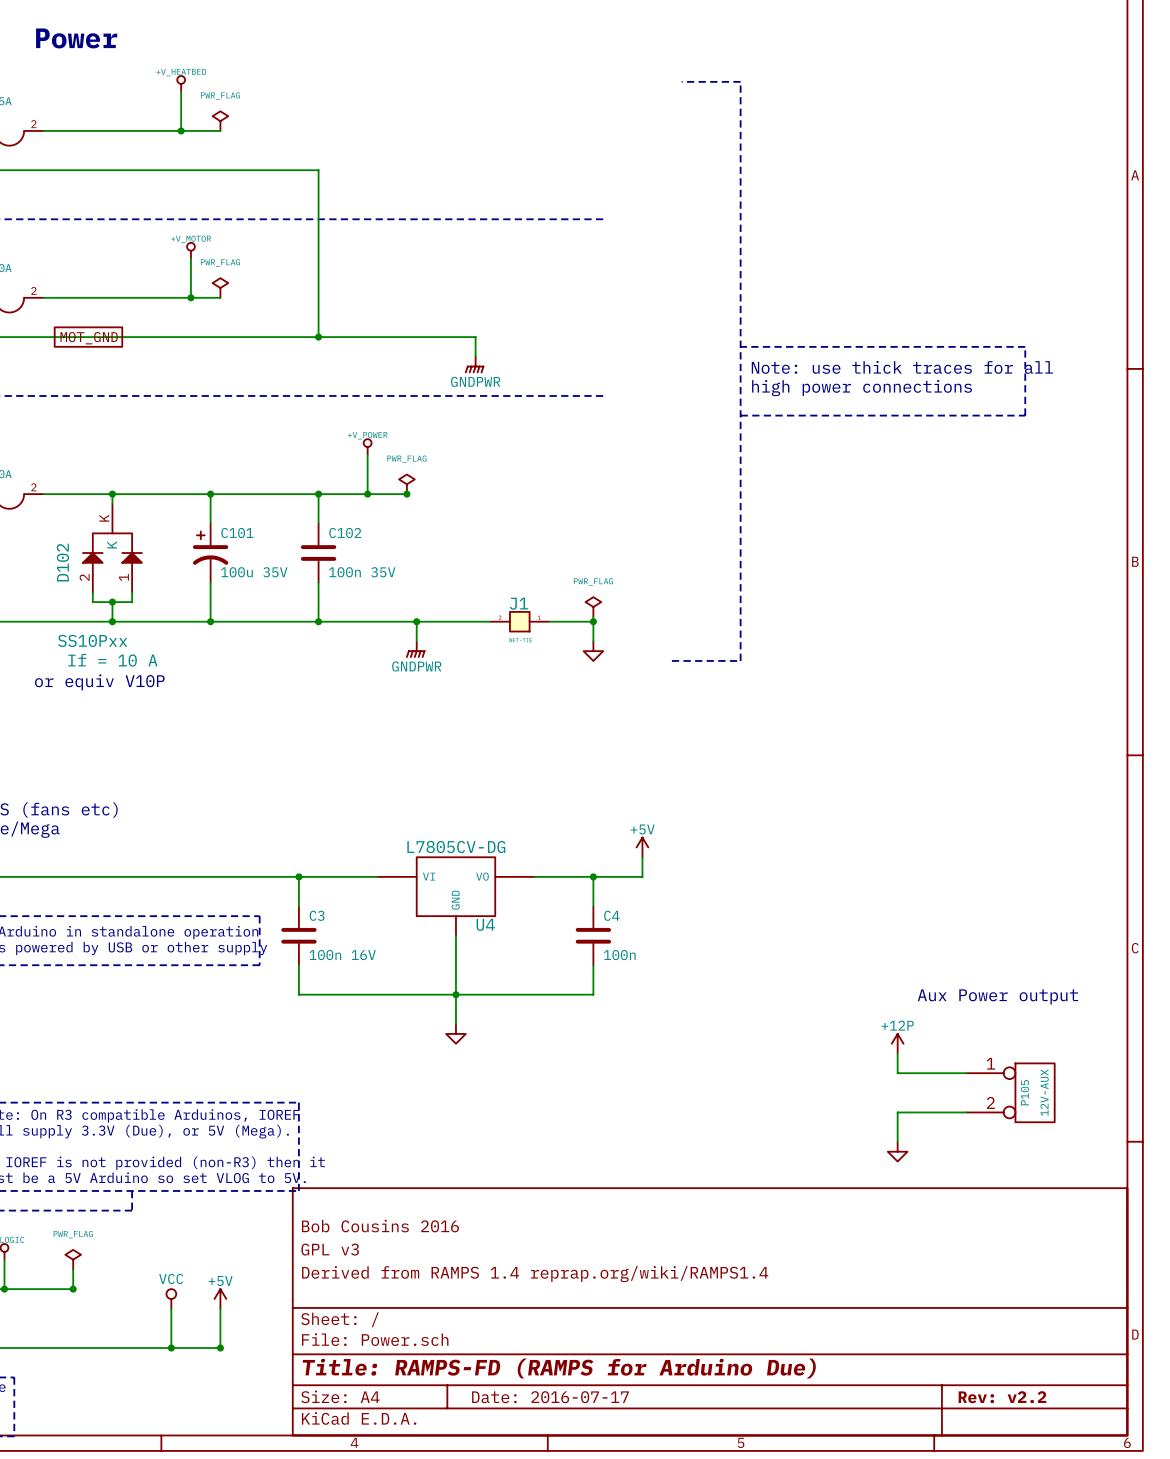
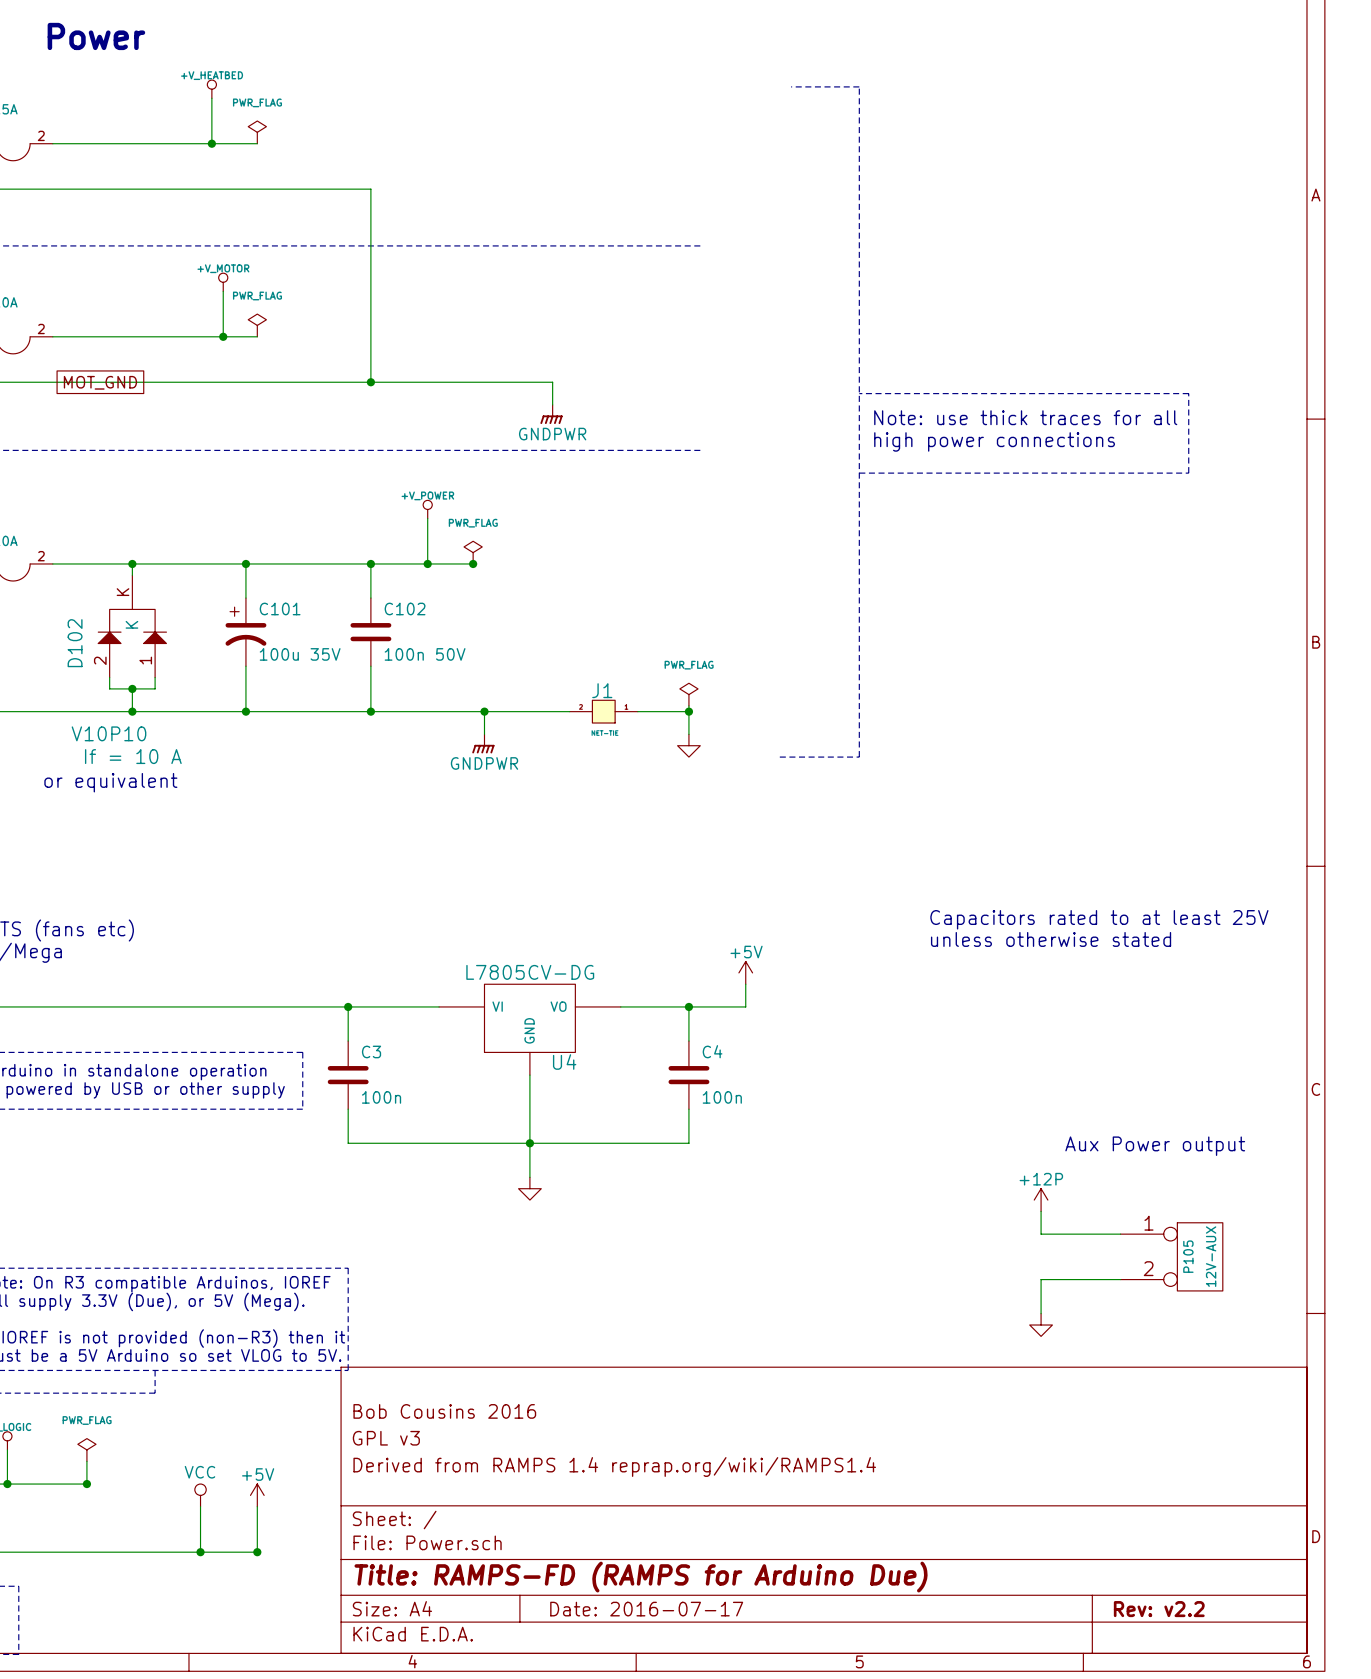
C102 value: 100n 35V (362, 572) -> 100n 50V (425, 654)
D102 value: SS10Pxx (92, 640) -> V10P10 (109, 733)
text: or equiv V10P (99, 682) -> or equivalent (110, 782)
text: none -> Capacitors rated to at least 25V (1099, 919)
text: none -> unless otherwise stated (1051, 939)
C3 value: 100n 16V (342, 955) -> 100n (381, 1097)

